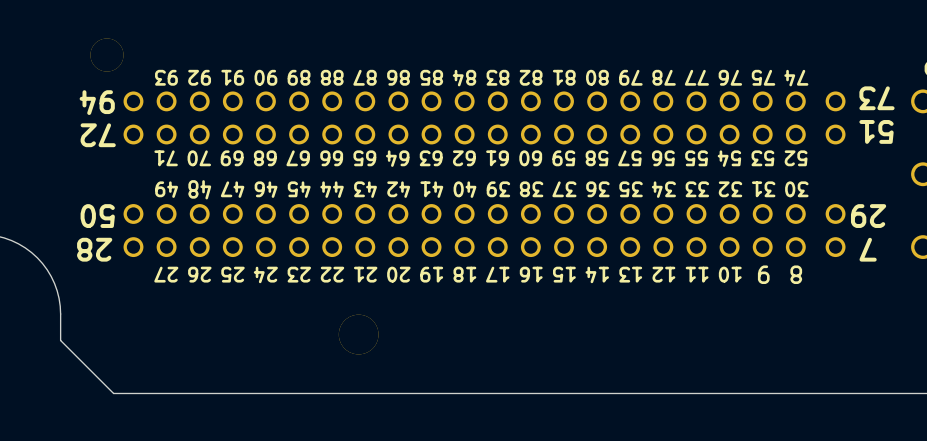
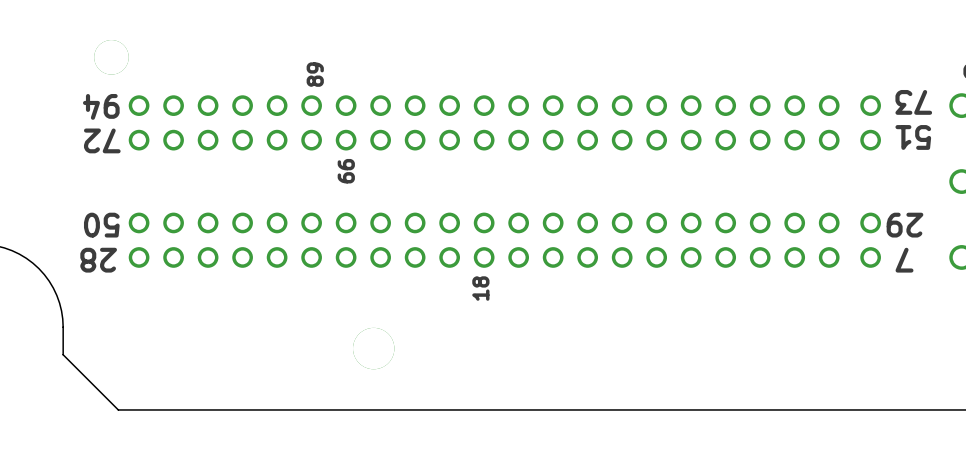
text: 93 (166, 77) -> none
text: 92 (199, 77) -> none
text: 91 (232, 77) -> none
text: 90 (265, 77) -> none
text rotation: 0° (299, 77) -> 90° clockwise (315, 74)
text: 88 (332, 77) -> none
text: 87 (365, 77) -> none
text: 86 (398, 77) -> none
text: 85 (431, 77) -> none
text: 83 (497, 77) -> none
text: 82 (531, 77) -> none
text: 81 (564, 77) -> none
text: 80 (597, 77) -> none
text: 79 (630, 77) -> none
text: 78 (664, 77) -> none
text: 77 (696, 77) -> none
text: 76 (730, 77) -> none
text: 75 (763, 77) -> none
text: 84 (464, 78) -> none
text: 74 (796, 78) -> none
text: 71 (166, 158) -> none
text: 70 (199, 158) -> none
text: 69 (232, 158) -> none
text: 68 (265, 158) -> none
text: 67 (298, 158) -> none
text rotation: 0° (331, 158) -> 90° clockwise (346, 171)
text: 65 (364, 158) -> none
text: 64 (397, 158) -> none
text: 63 (431, 158) -> none
text: 62 (464, 158) -> none
text: 61 (497, 158) -> none
text: 60 (530, 158) -> none
text: 59 (563, 158) -> none
text: 58 (597, 158) -> none
text: 57 (629, 158) -> none
text: 56 (663, 158) -> none
text: 55 (696, 158) -> none
text: 54 (729, 158) -> none
text: 53 (762, 158) -> none
text: 52 (796, 158) -> none
text: 49 (166, 189) -> none
text: 48 (199, 189) -> none
text: 47 (232, 189) -> none
text: 46 (266, 189) -> none
text: 45 (299, 189) -> none
text: 44 (332, 189) -> none
text: 43 (365, 189) -> none
text: 42 (398, 189) -> none
text: 41 (431, 189) -> none
text: 40 (464, 189) -> none
text: 39 (498, 189) -> none
text: 38 (531, 189) -> none
text: 37 (564, 189) -> none
text: 36 (597, 189) -> none
text: 35 (631, 189) -> none
text: 34 (663, 189) -> none
text: 33 (697, 189) -> none
text: 32 (730, 189) -> none
text: 31 (763, 189) -> none
text: 30 (796, 189) -> none
text: 27 (166, 274) -> none
text: 26 (199, 274) -> none
text: 25 (232, 274) -> none
text: 24 (265, 274) -> none
text: 23 (299, 274) -> none
text: 22 (332, 274) -> none
text: 21 (365, 274) -> none
text: 20 (398, 274) -> none
text: 19 (431, 274) -> none
text rotation: 0° (464, 274) -> 90° clockwise (480, 288)
text: 17 (497, 274) -> none
text: 16 (531, 274) -> none
text: 15 (564, 274) -> none
text: 14 (597, 274) -> none
text: 13 (630, 274) -> none
text: 12 (663, 274) -> none
text: 11 (697, 274) -> none
text: 10 (730, 274) -> none
text: 9 (763, 274) -> none
text: 8 (796, 274) -> none

